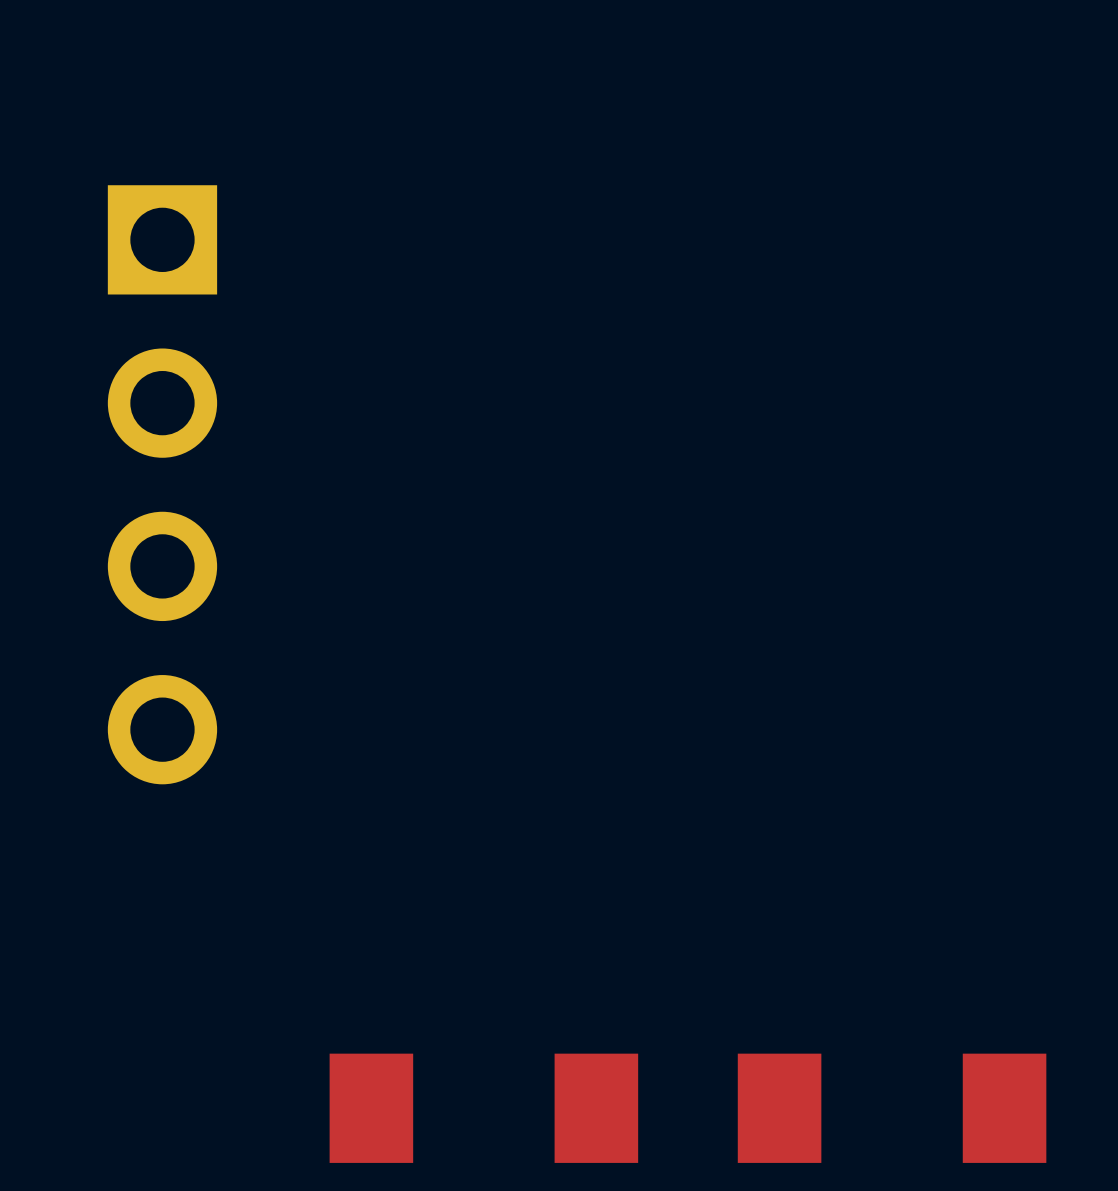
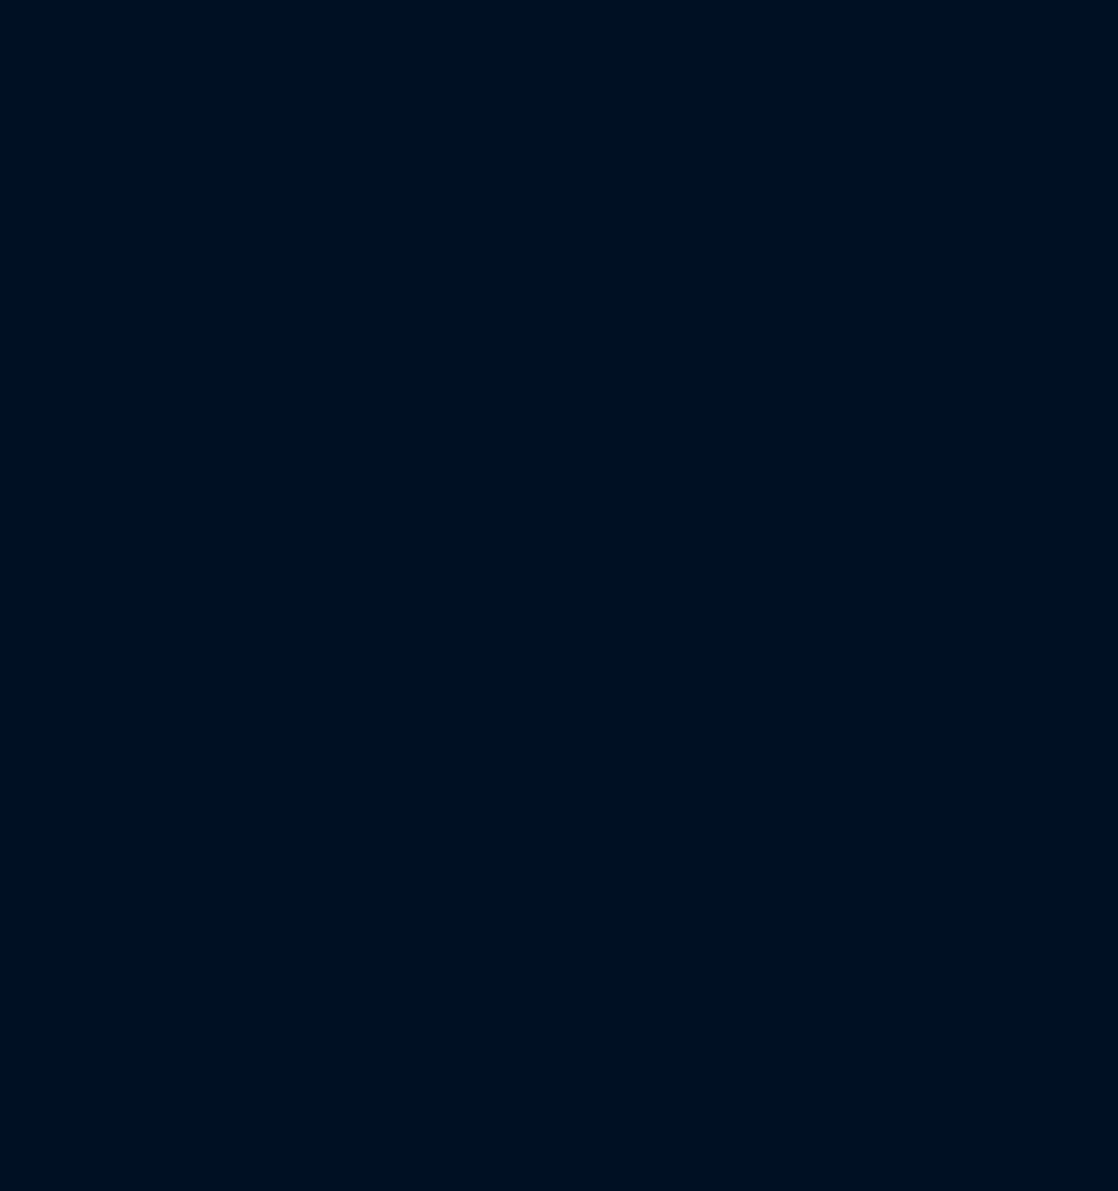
part: (162, 484) -> none
part: (483, 1108) -> none
part: (892, 1108) -> none

